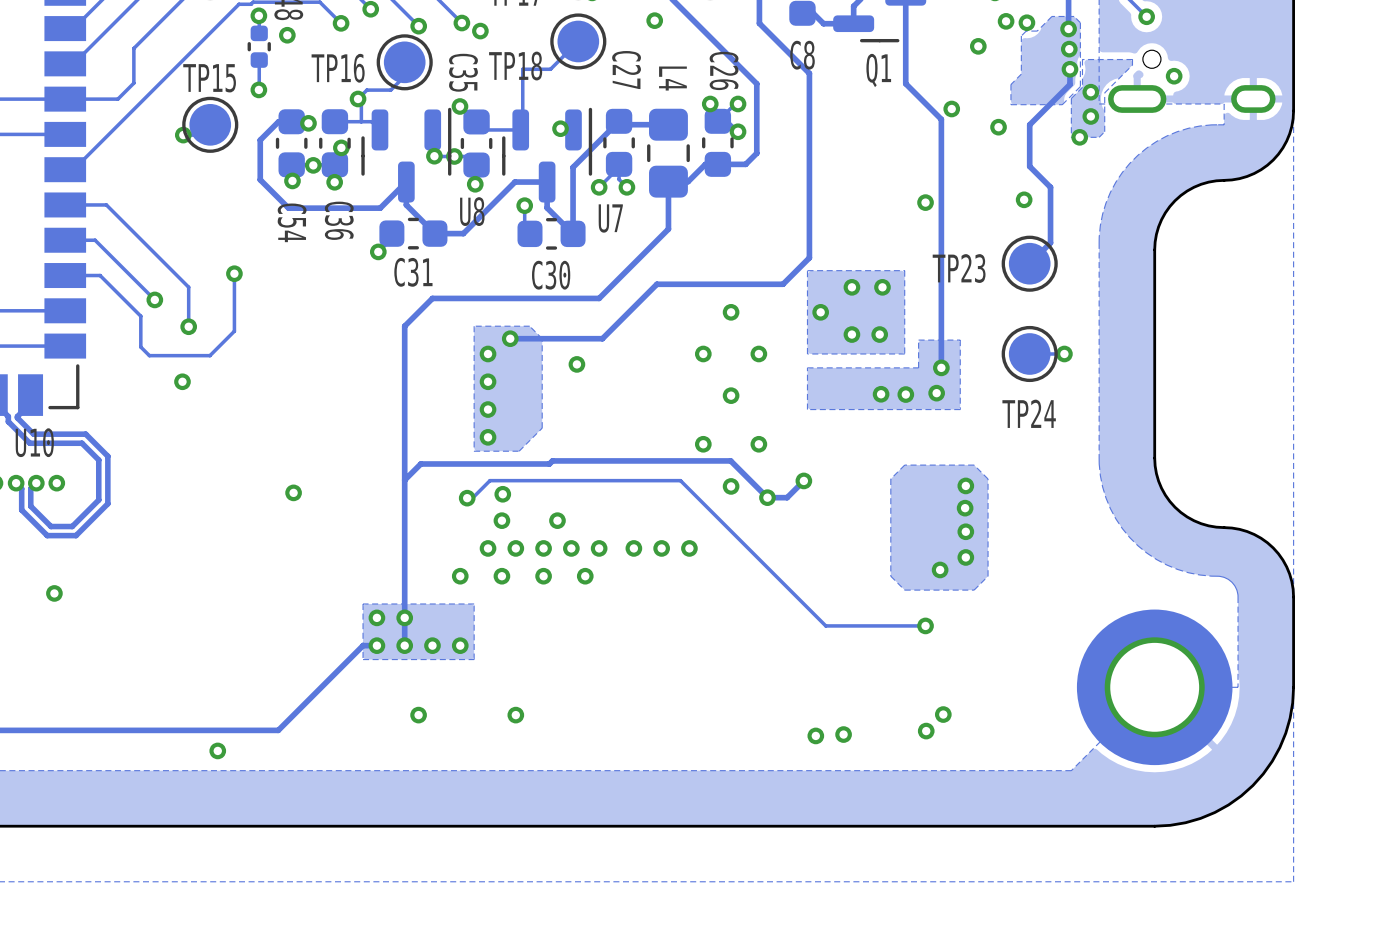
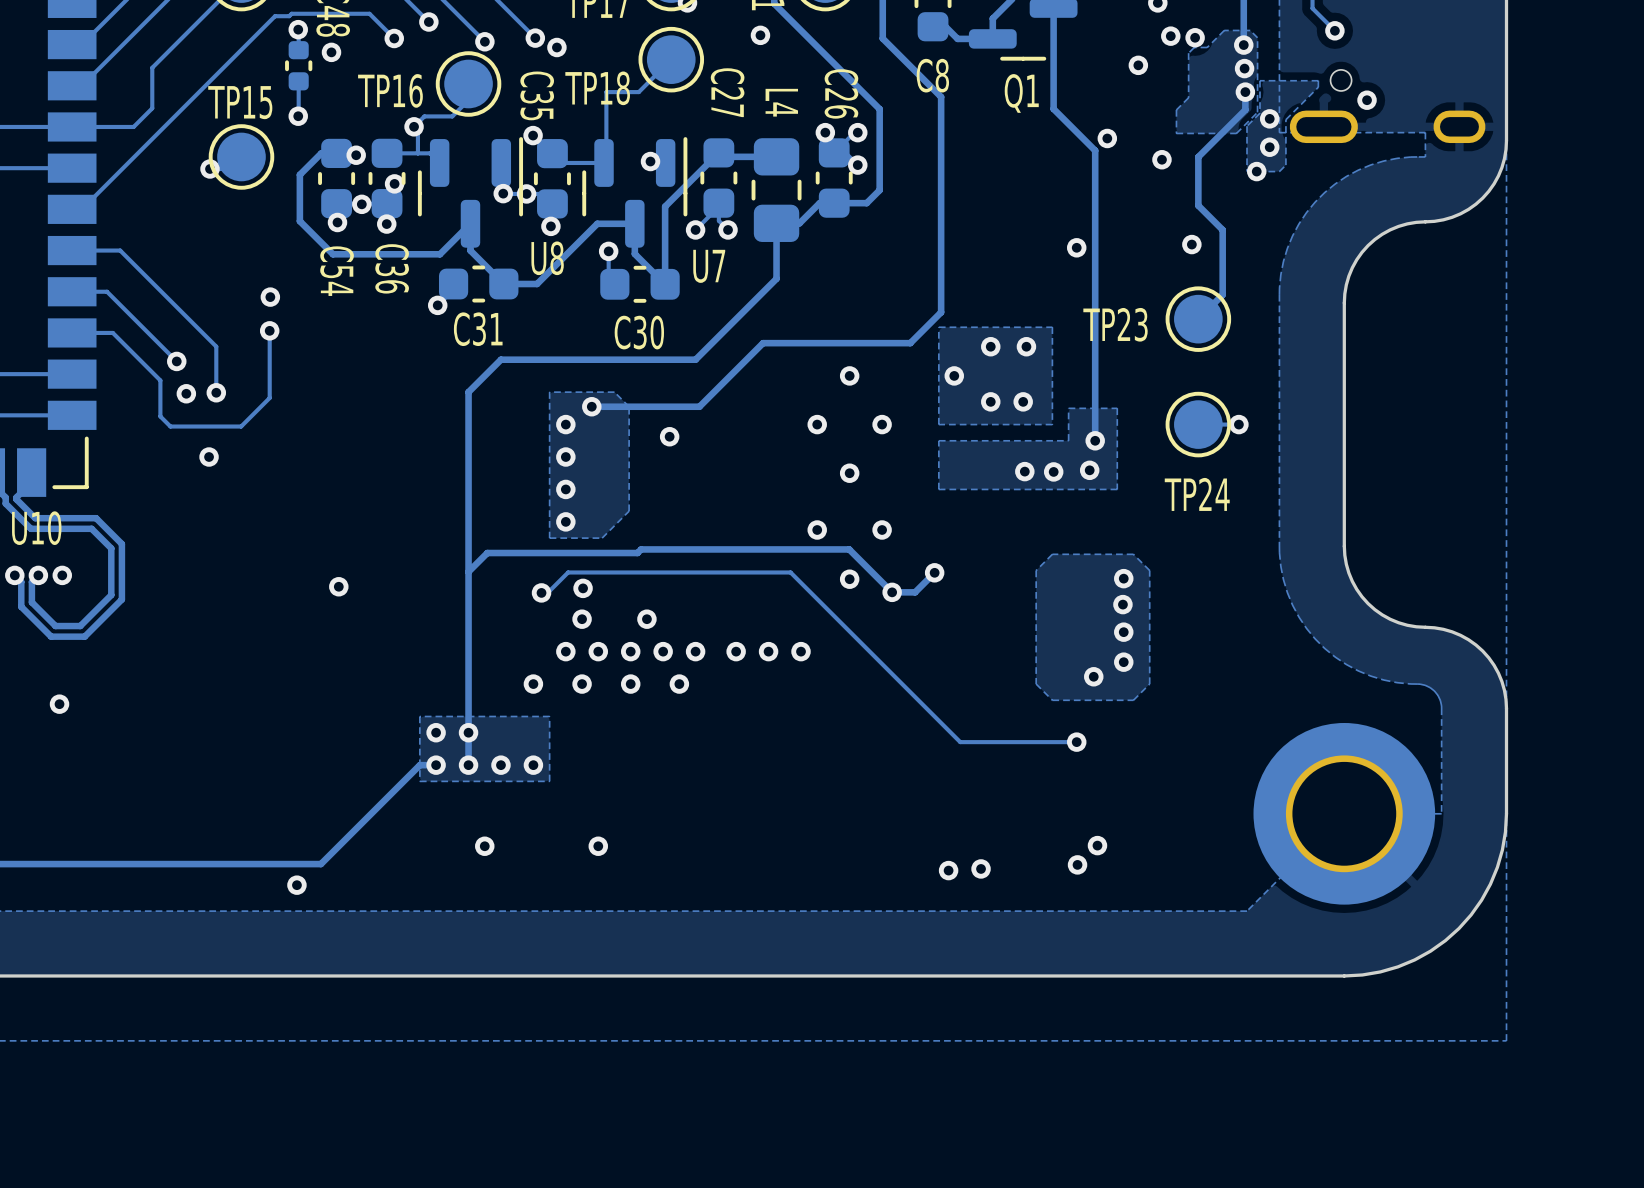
via: none -> (270, 297)
via: none -> (186, 393)
via position: (217, 750) -> (296, 885)

